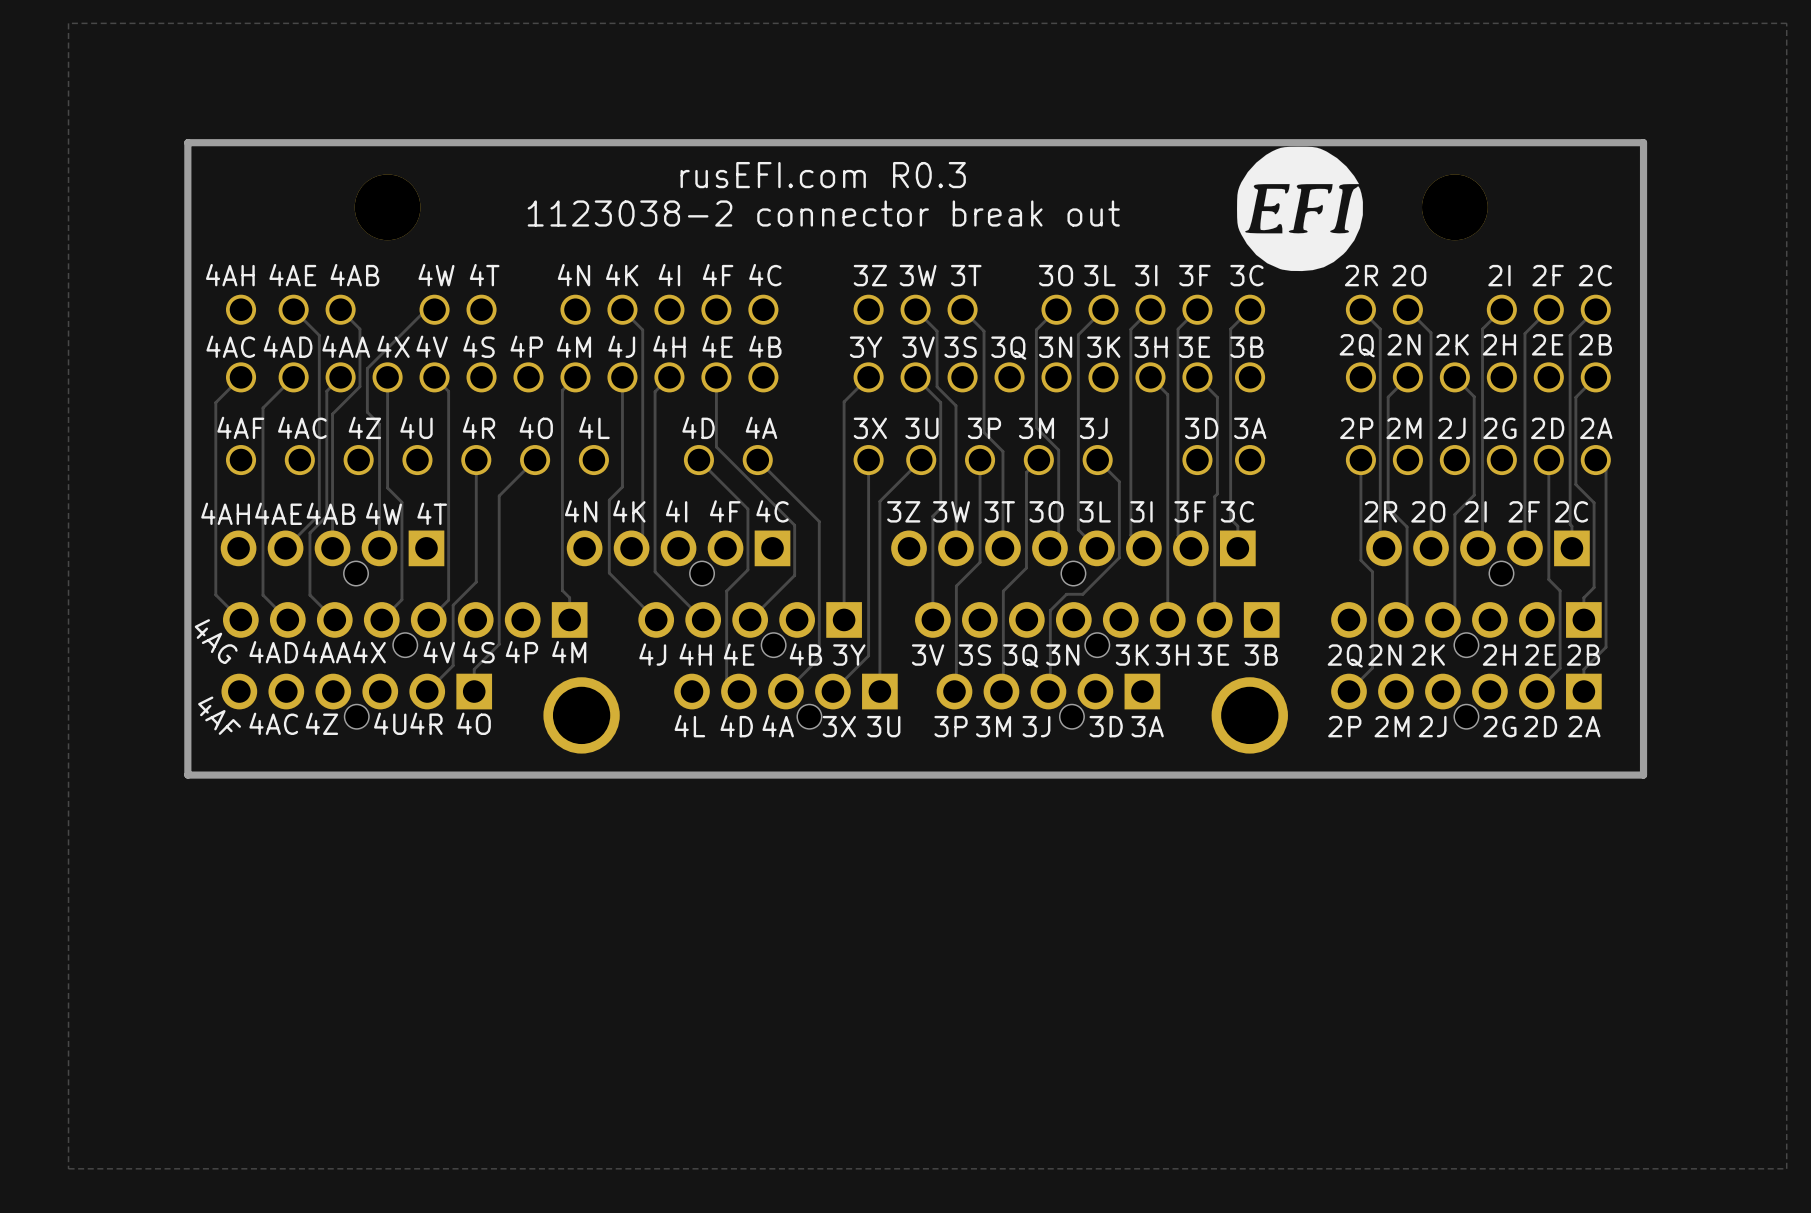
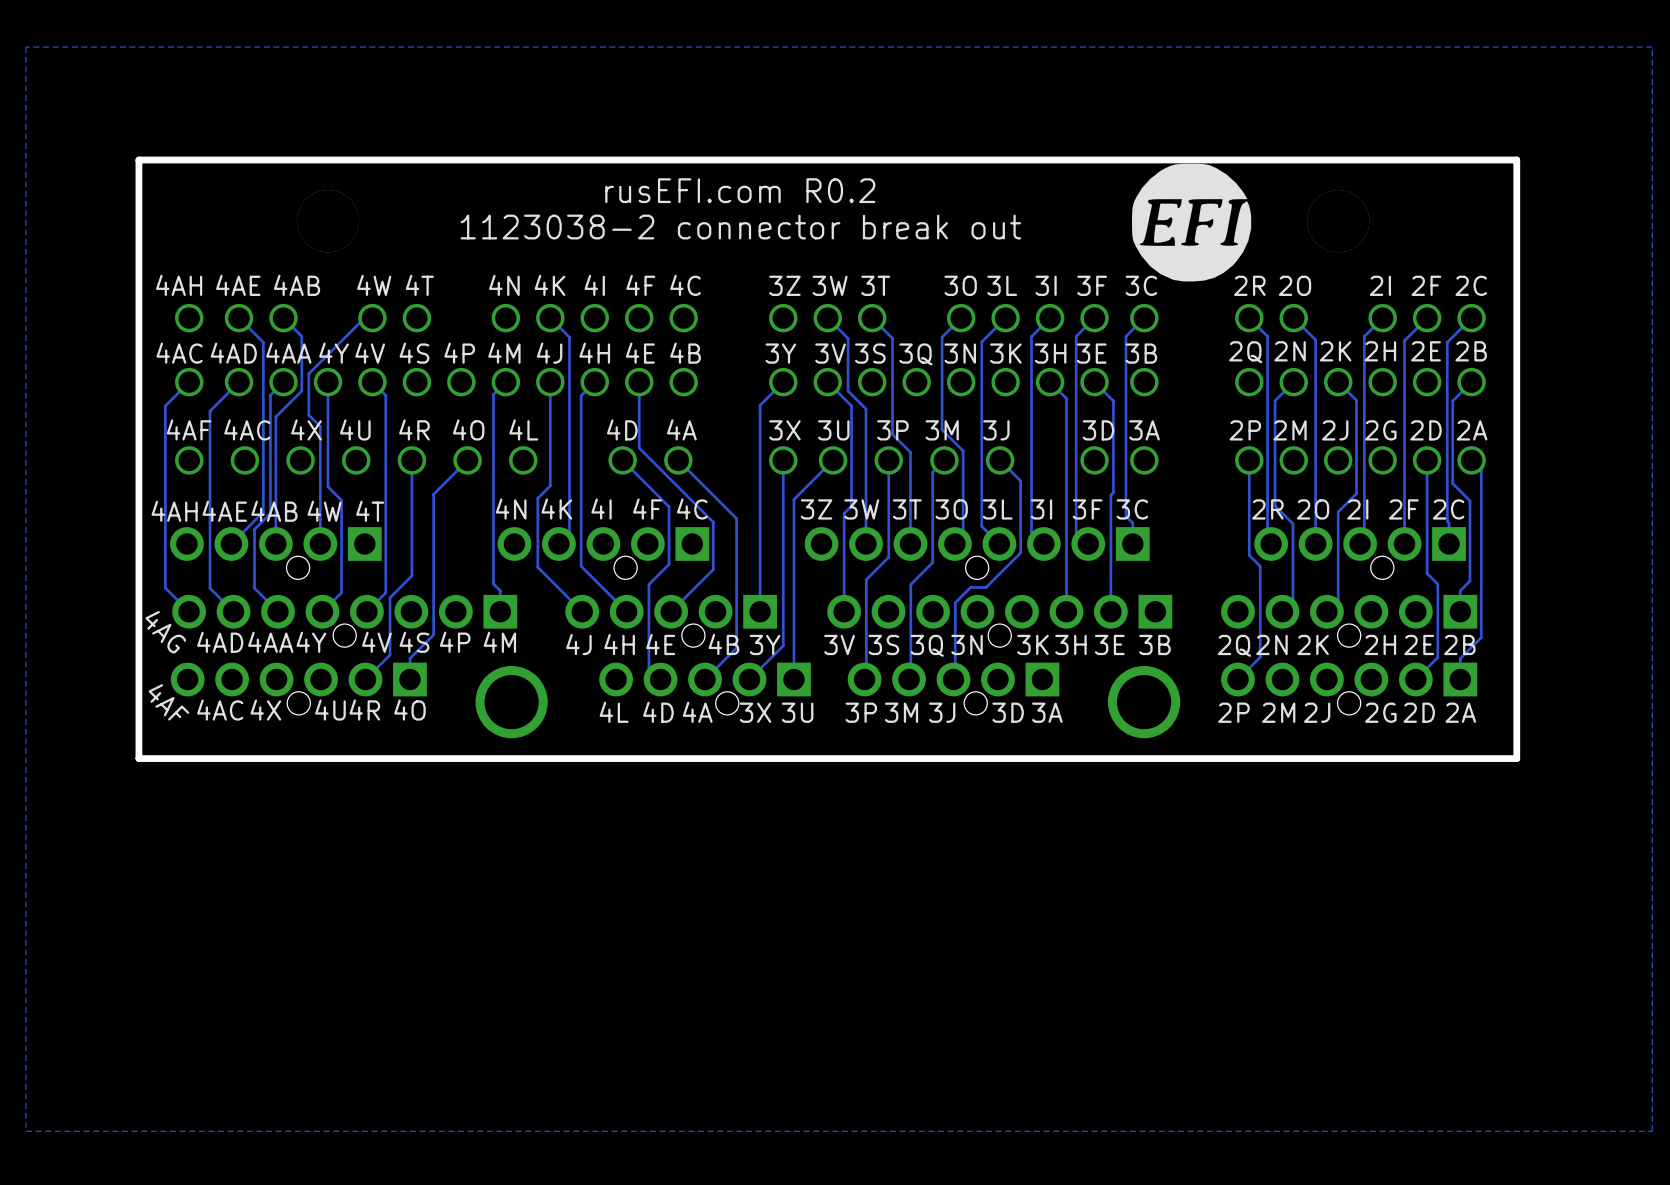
text: rusEFI.com R0.3 (823, 175) -> rusEFI.com R0.2 (740, 190)
text: 4X (393, 346) -> 4Y (334, 353)
text: 4Z (364, 427) -> 4X (306, 429)
text: 4X (369, 652) -> 4Y (311, 642)
text: 4Z (321, 723) -> 4X (265, 710)

